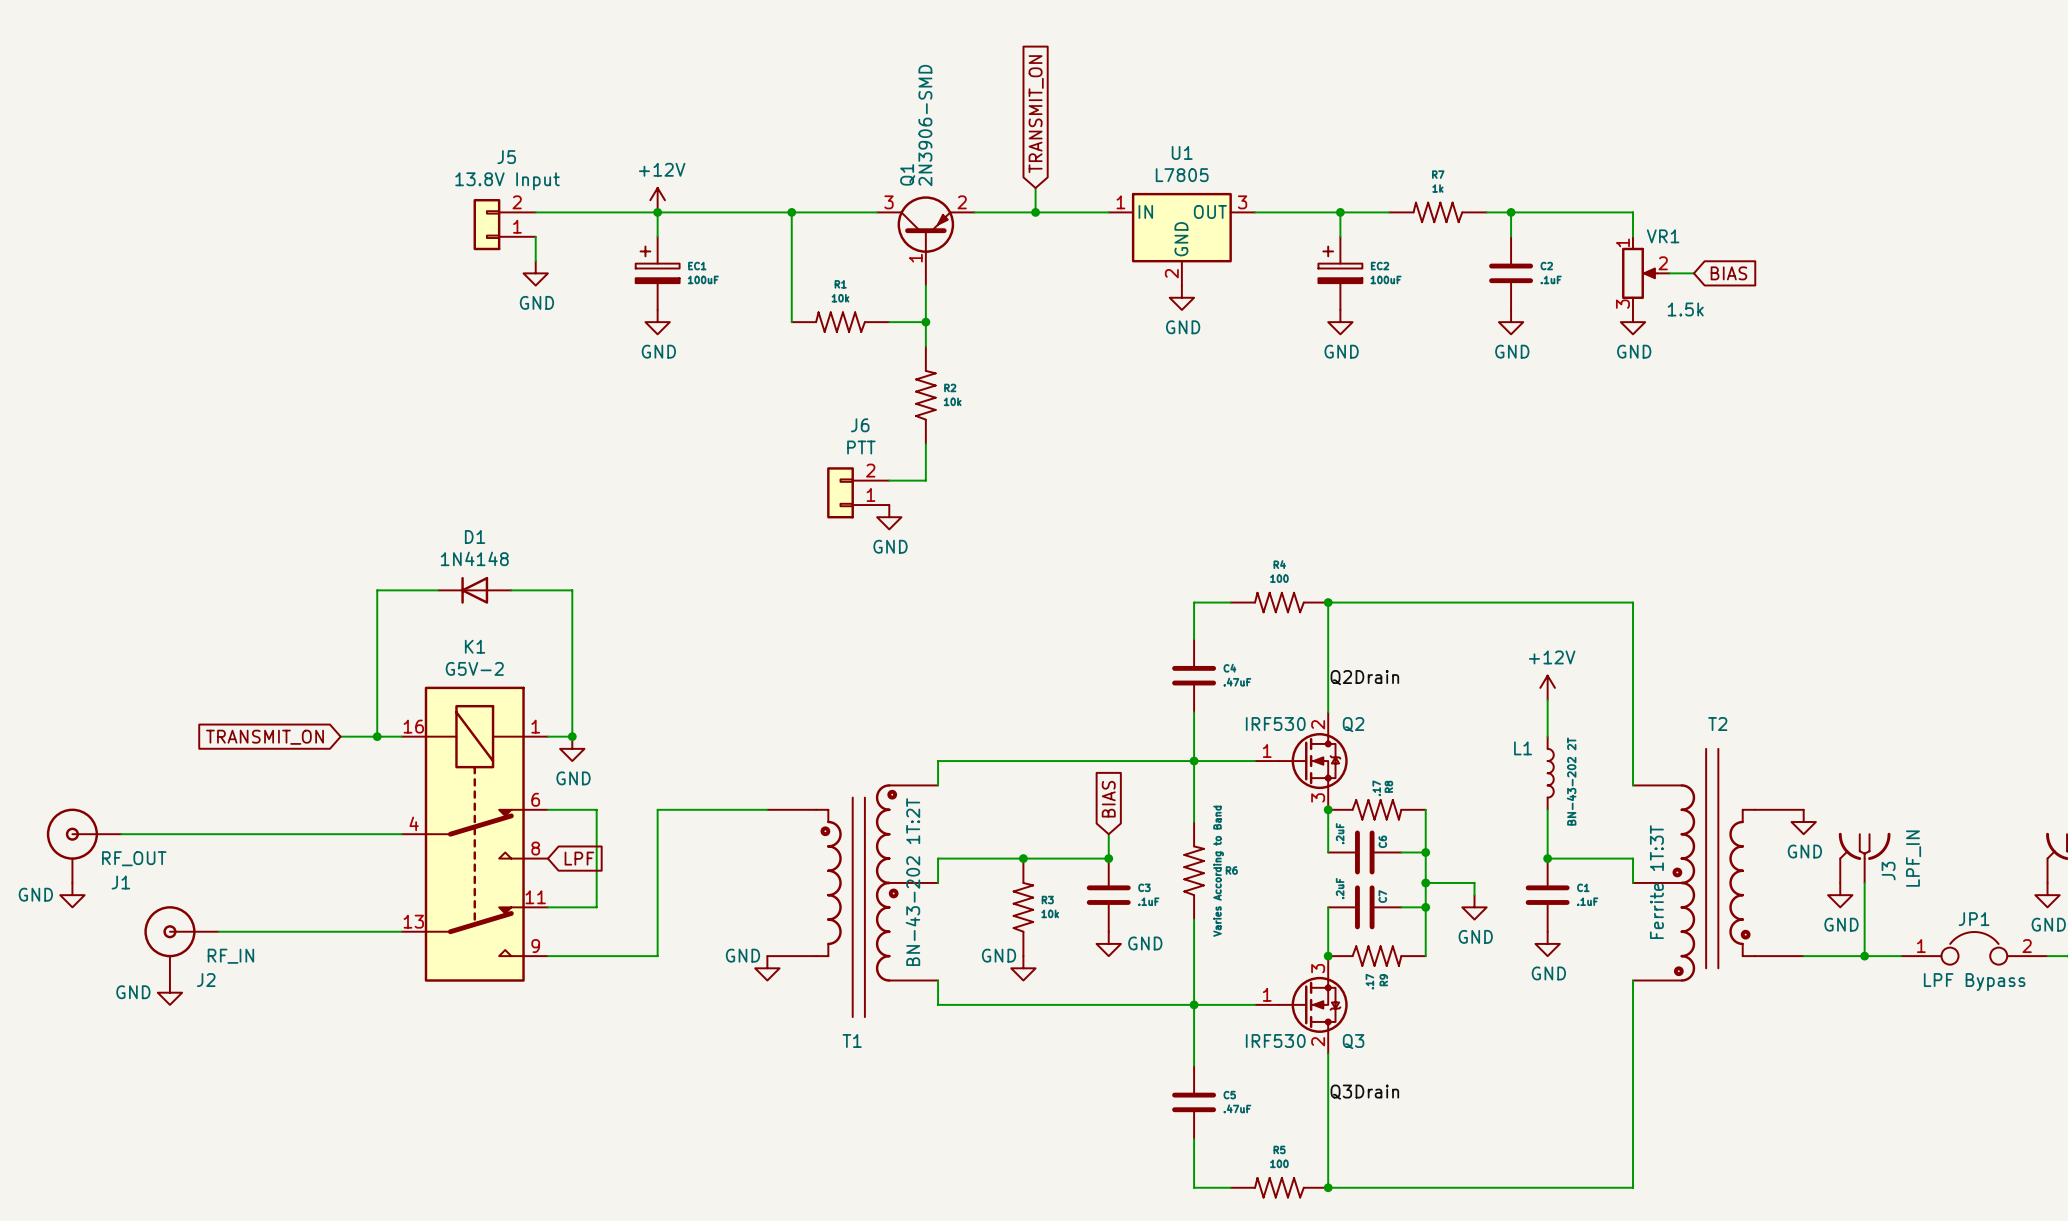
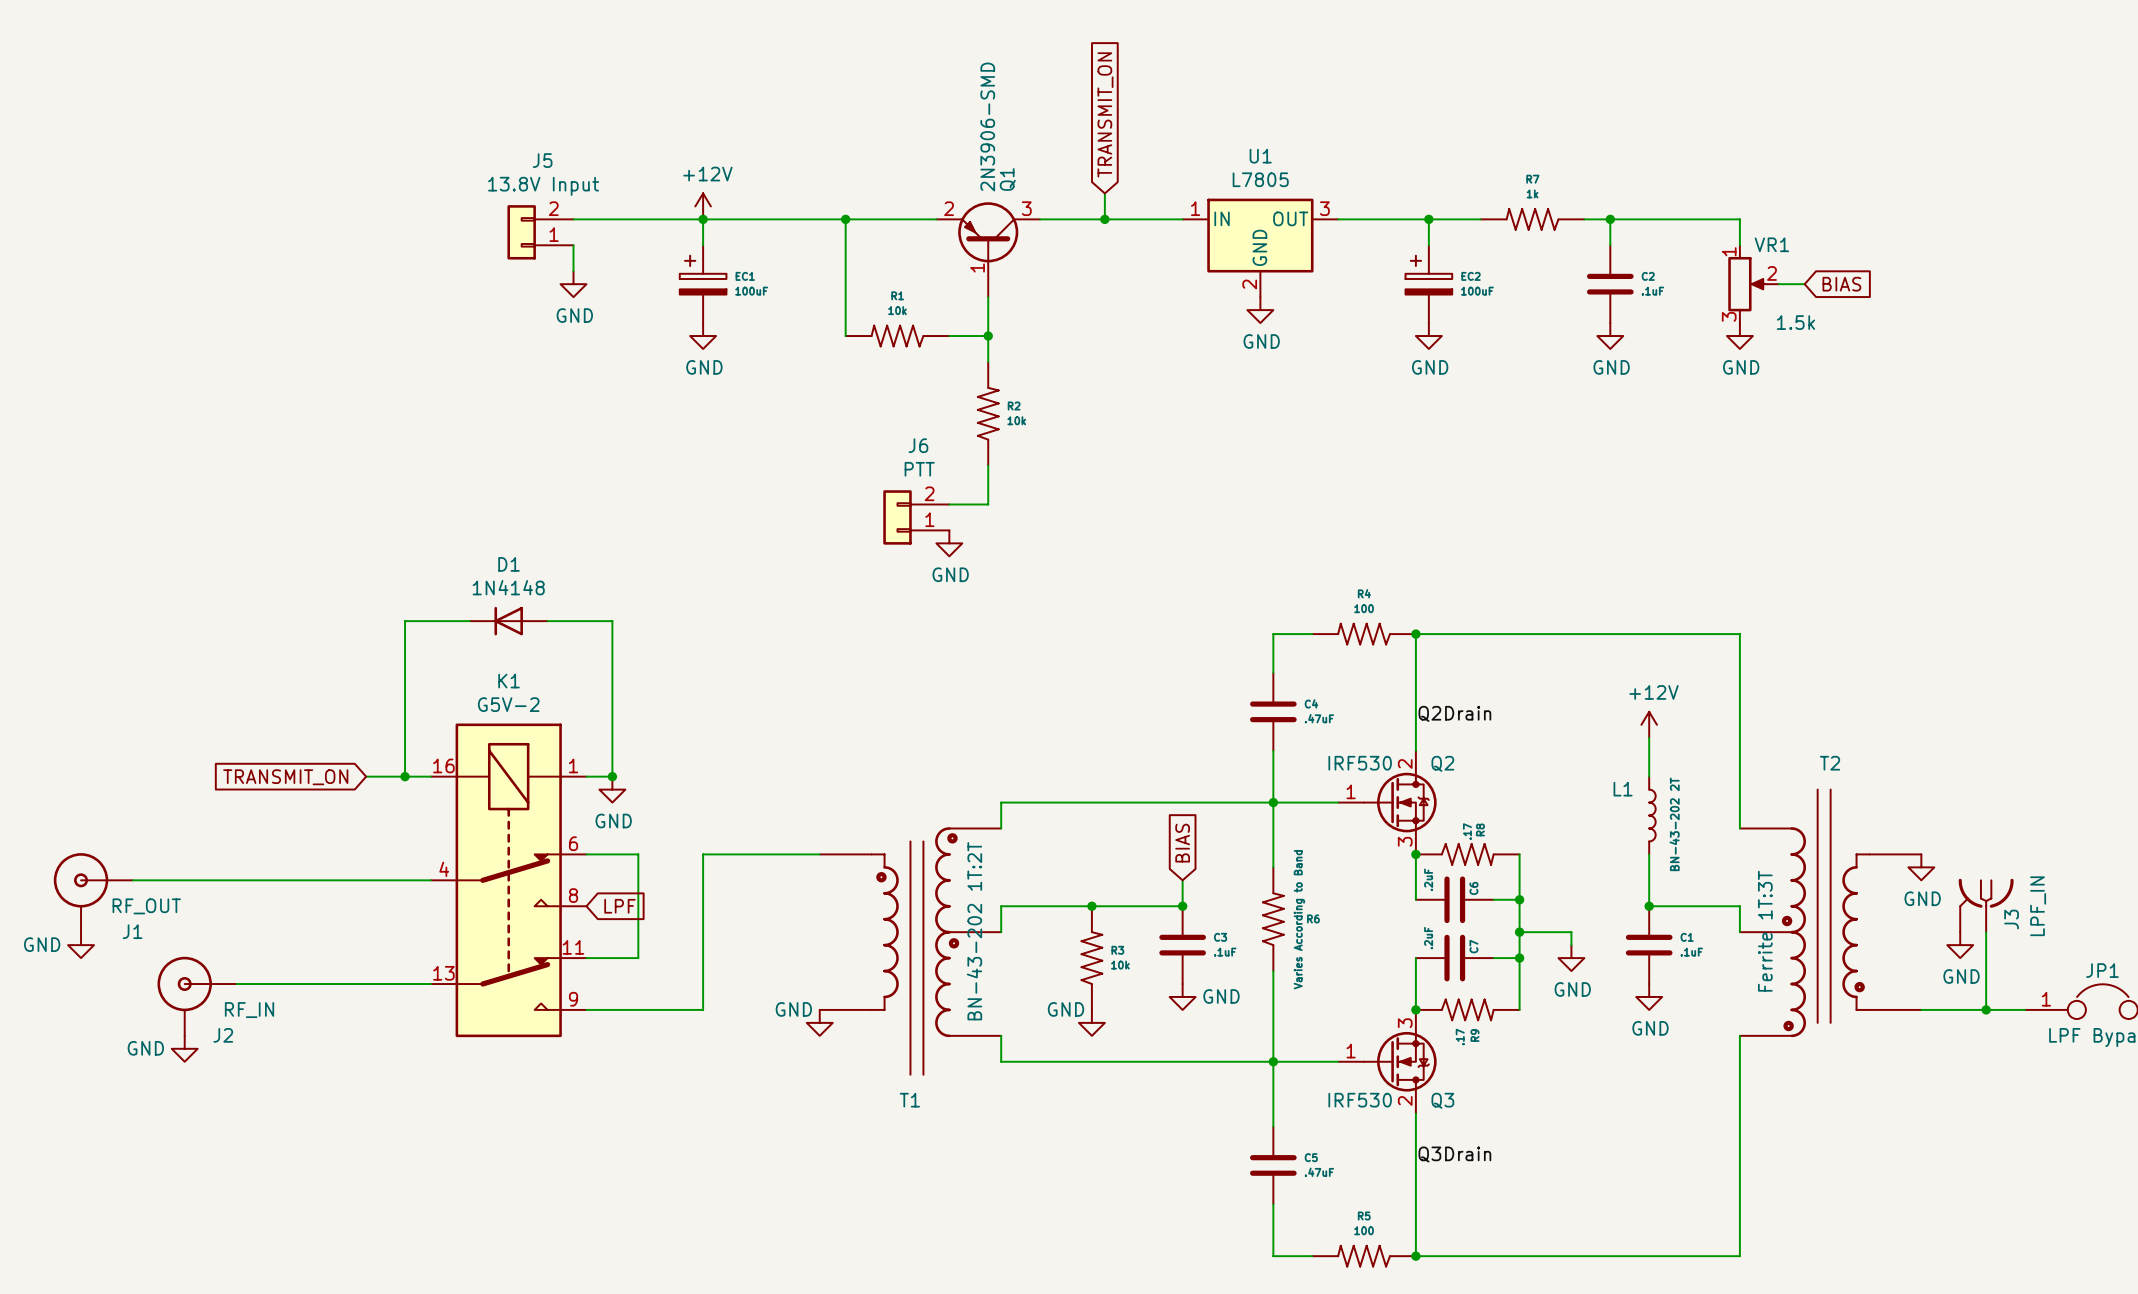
Q1 flip: as is (925, 224) -> left-right (988, 232)

